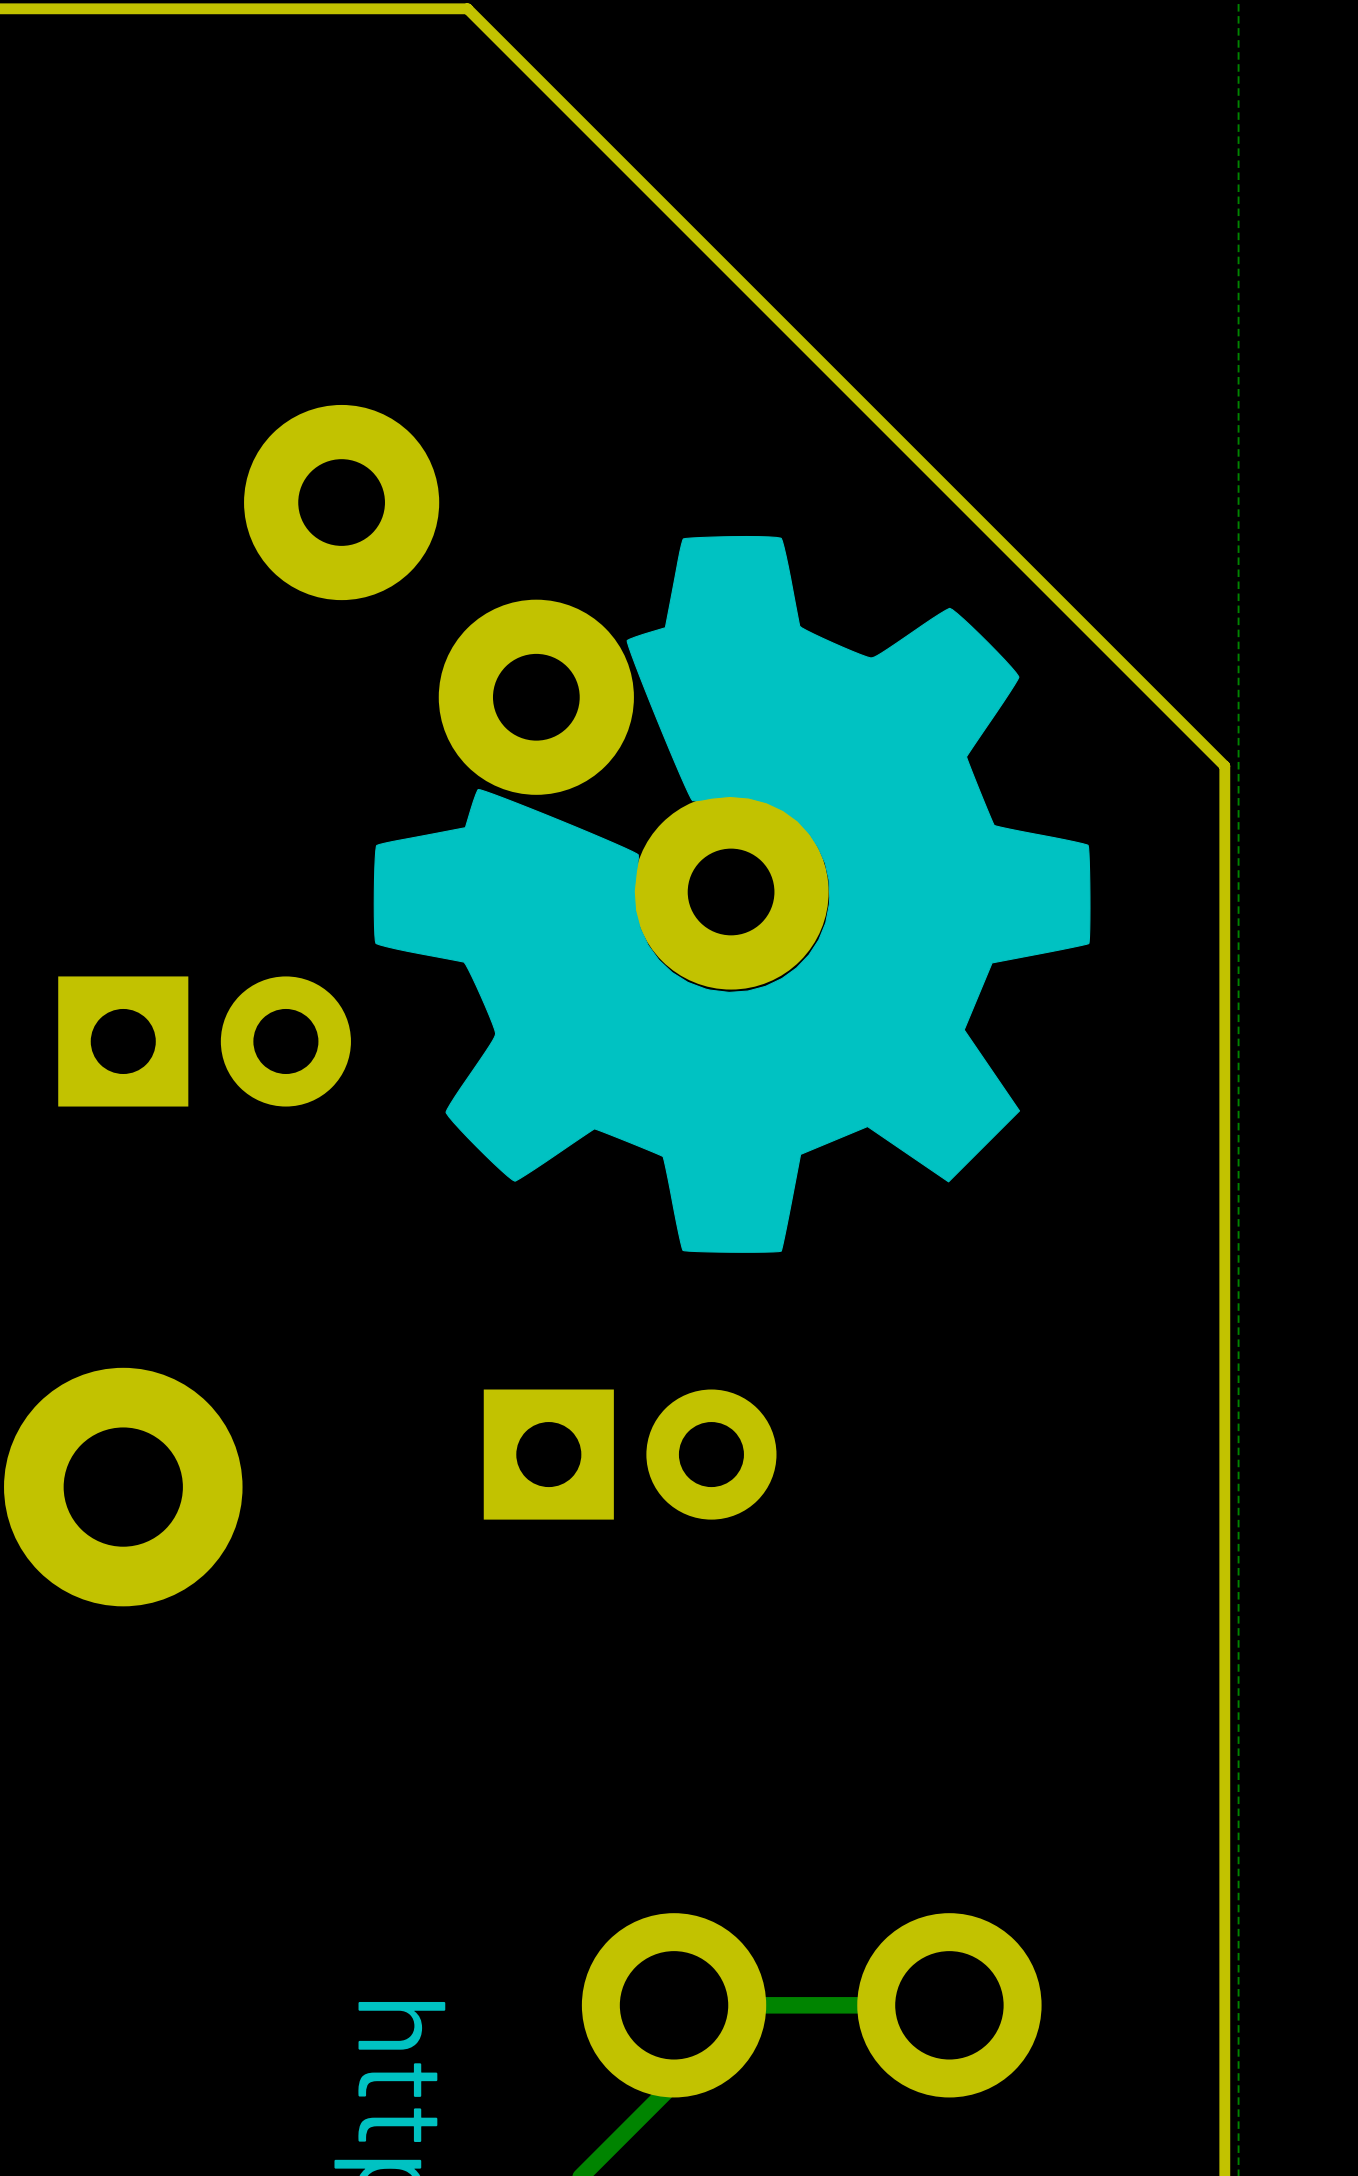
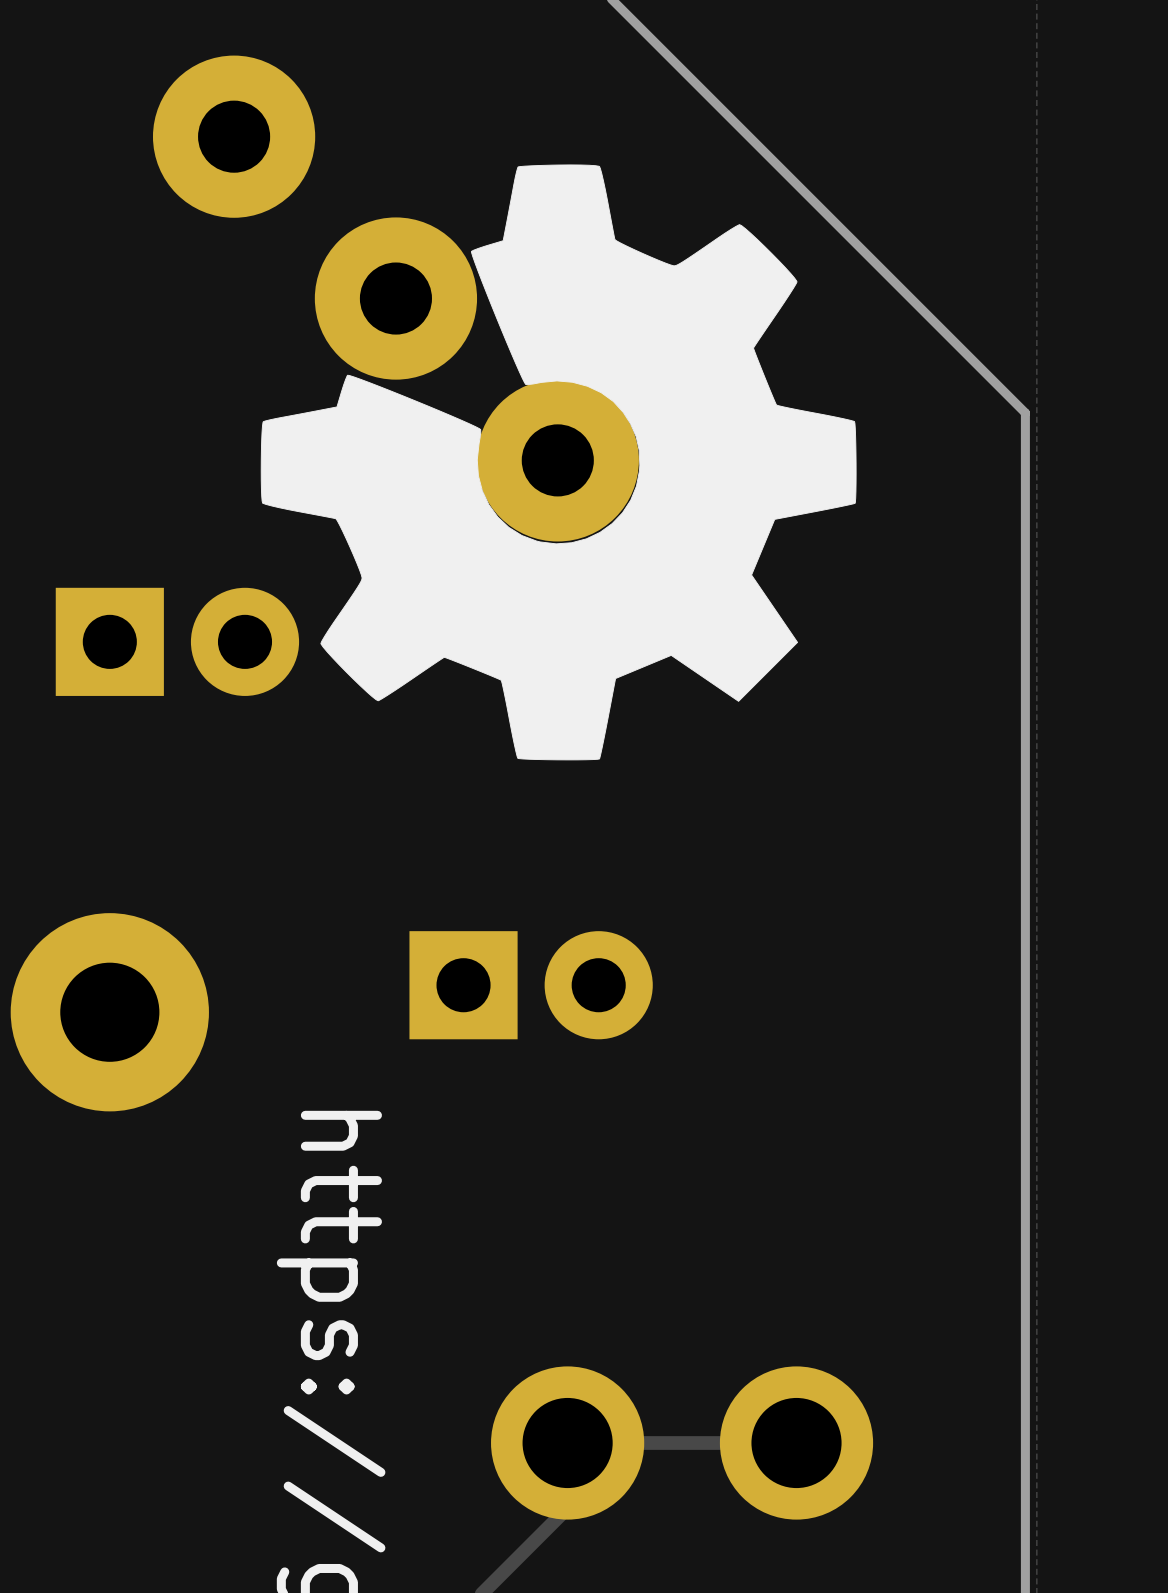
part position: (536, 697) -> (395, 298)
drawing position: (732, 894) -> (558, 462)

